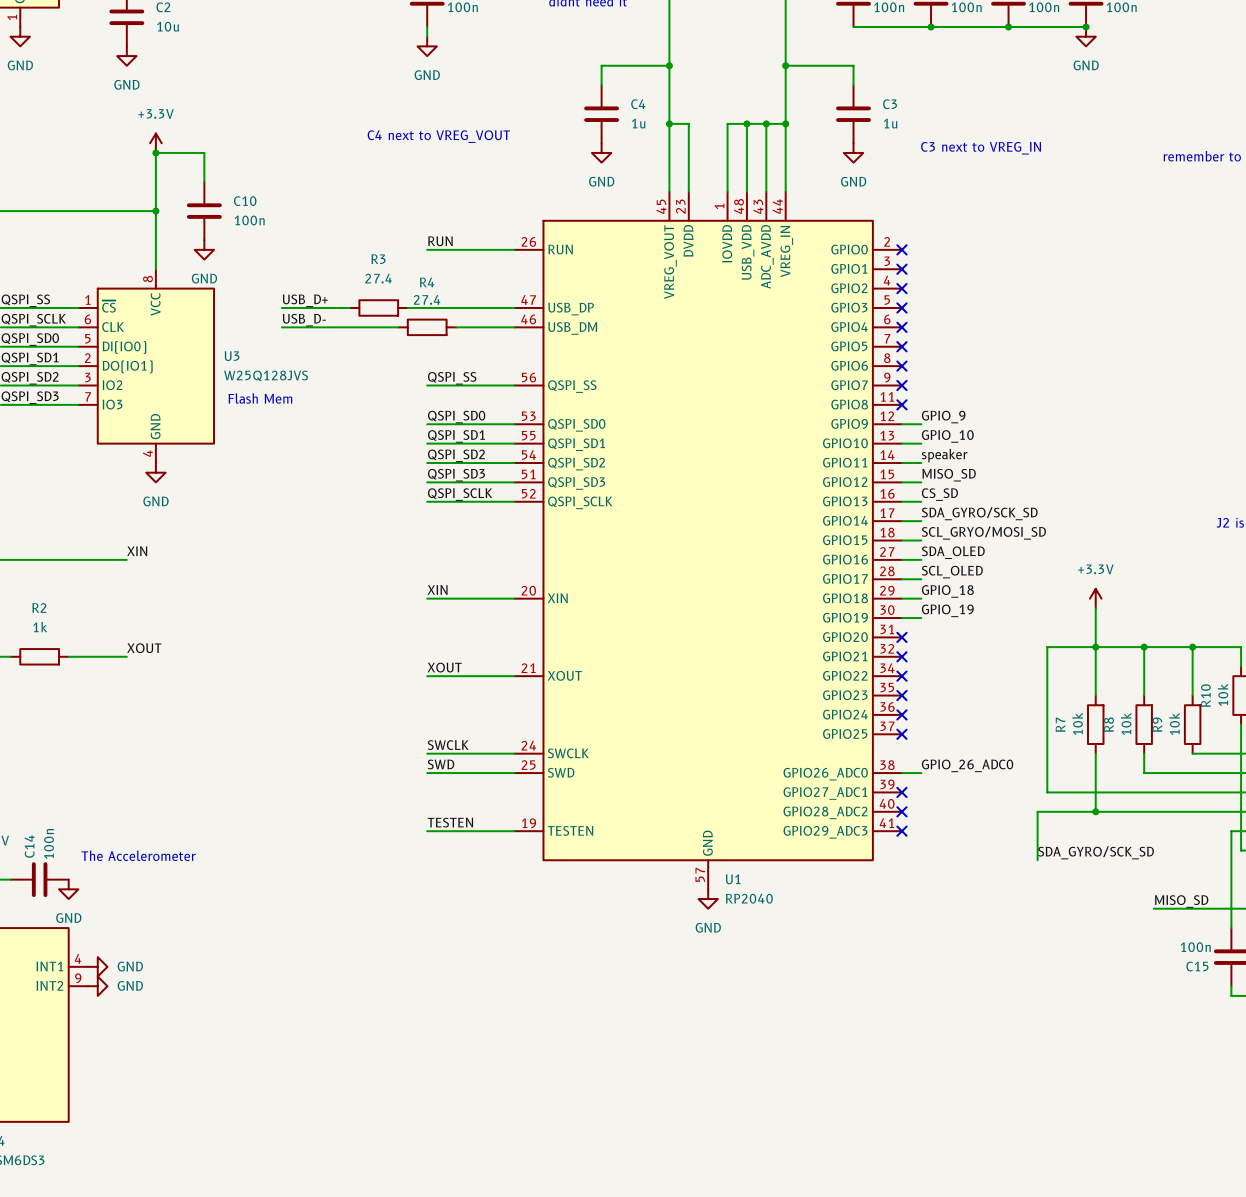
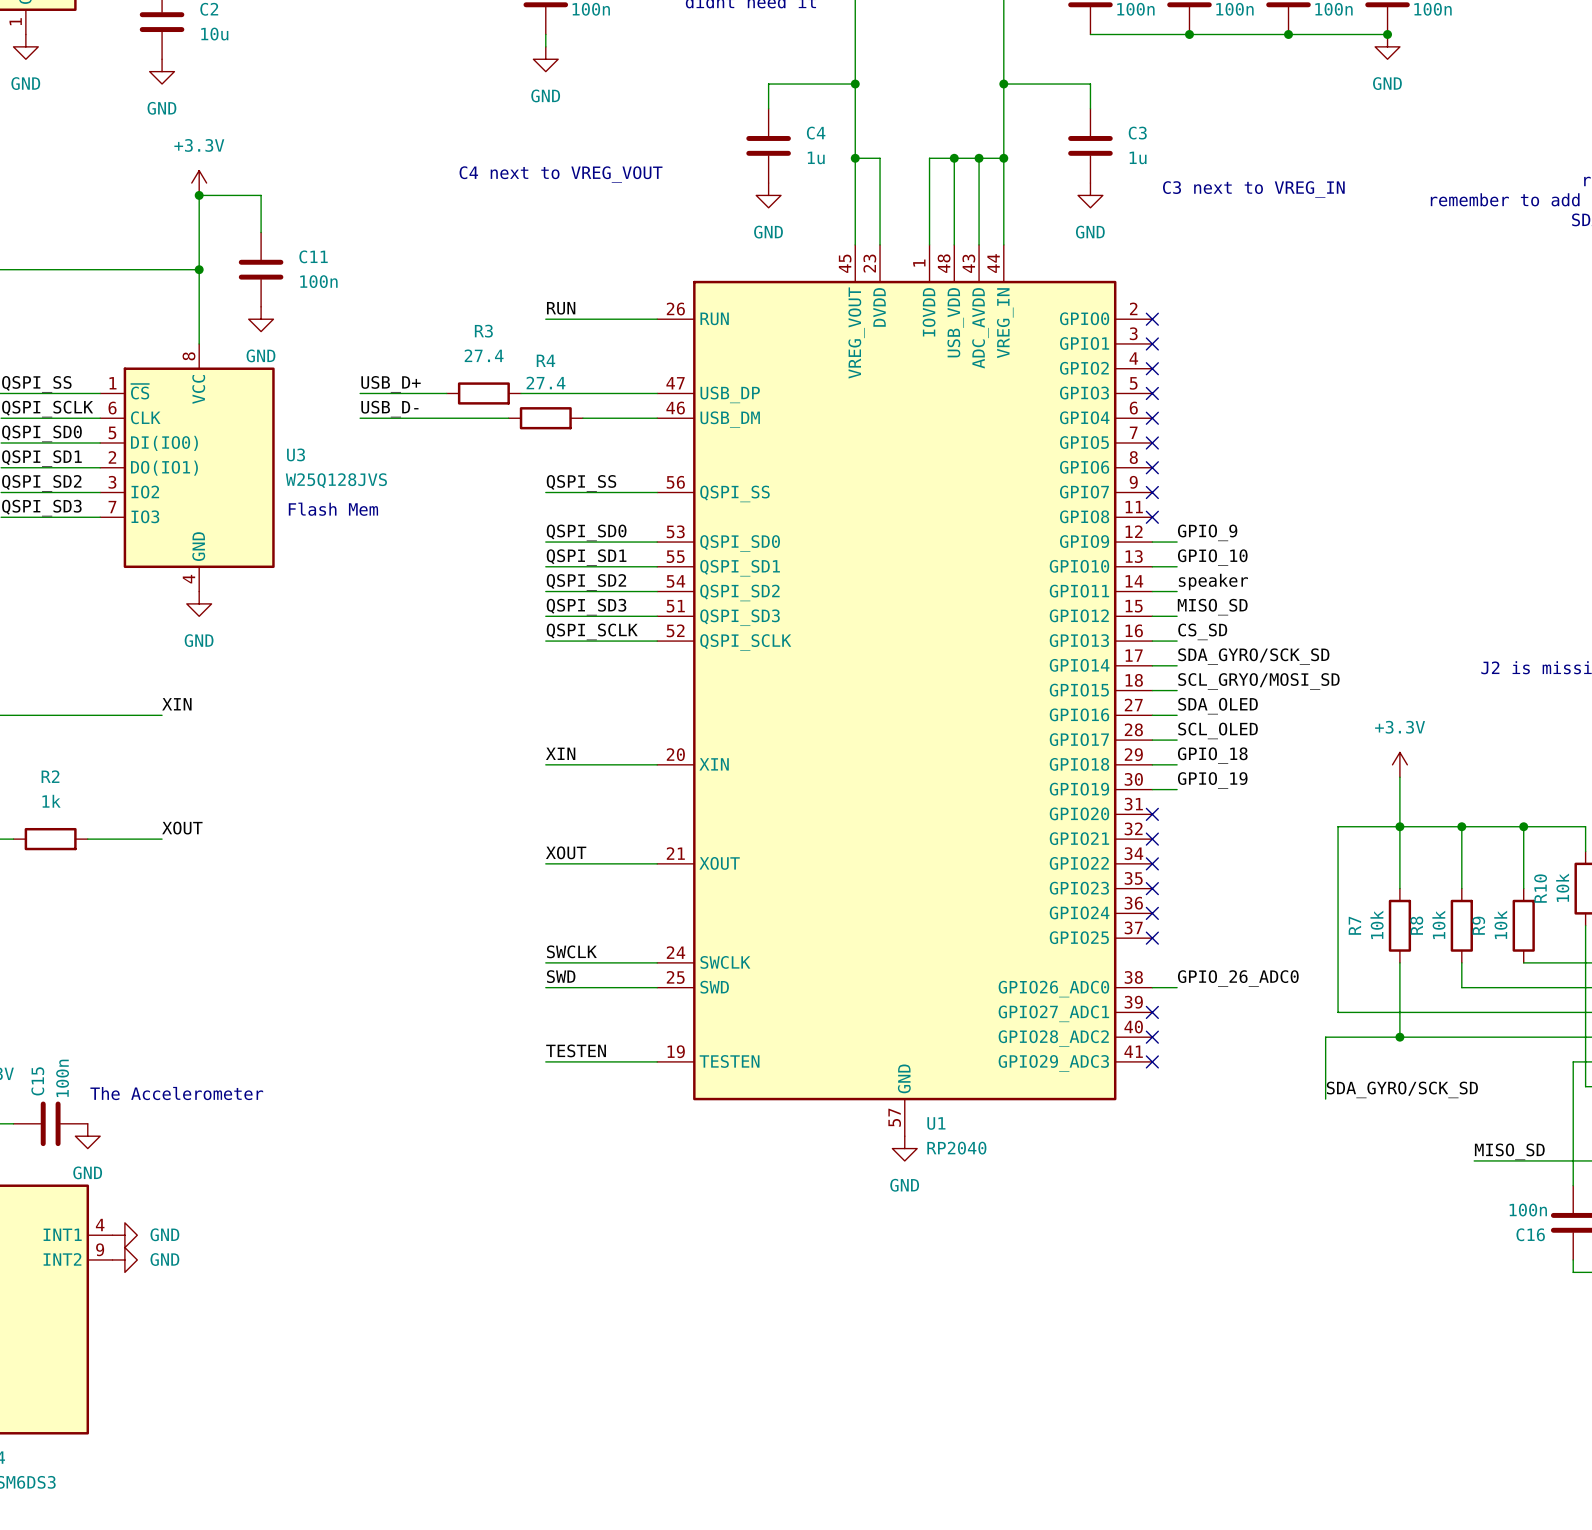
C10 name: C10 (245, 201) -> C11 (313, 256)
C14 name: C14 (29, 846) -> C15 (37, 1081)
C15 name: C15 (1197, 966) -> C16 (1530, 1234)

